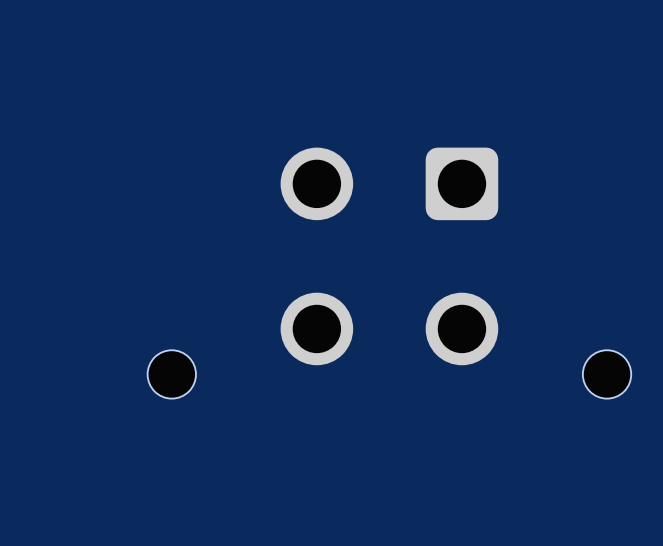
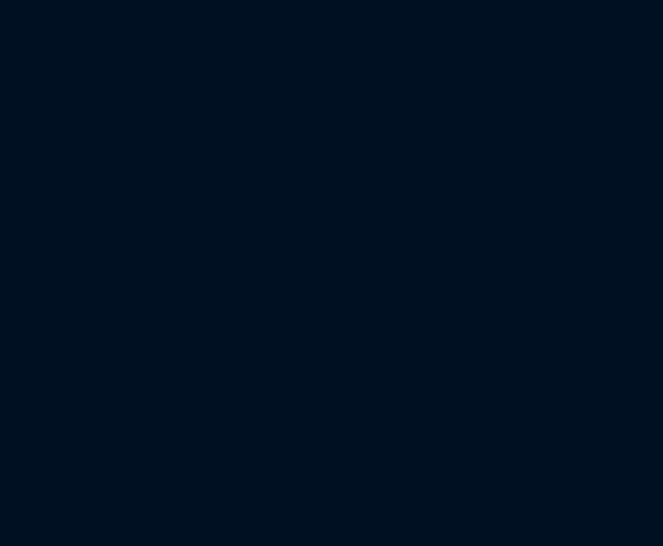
part: (389, 273) -> none

